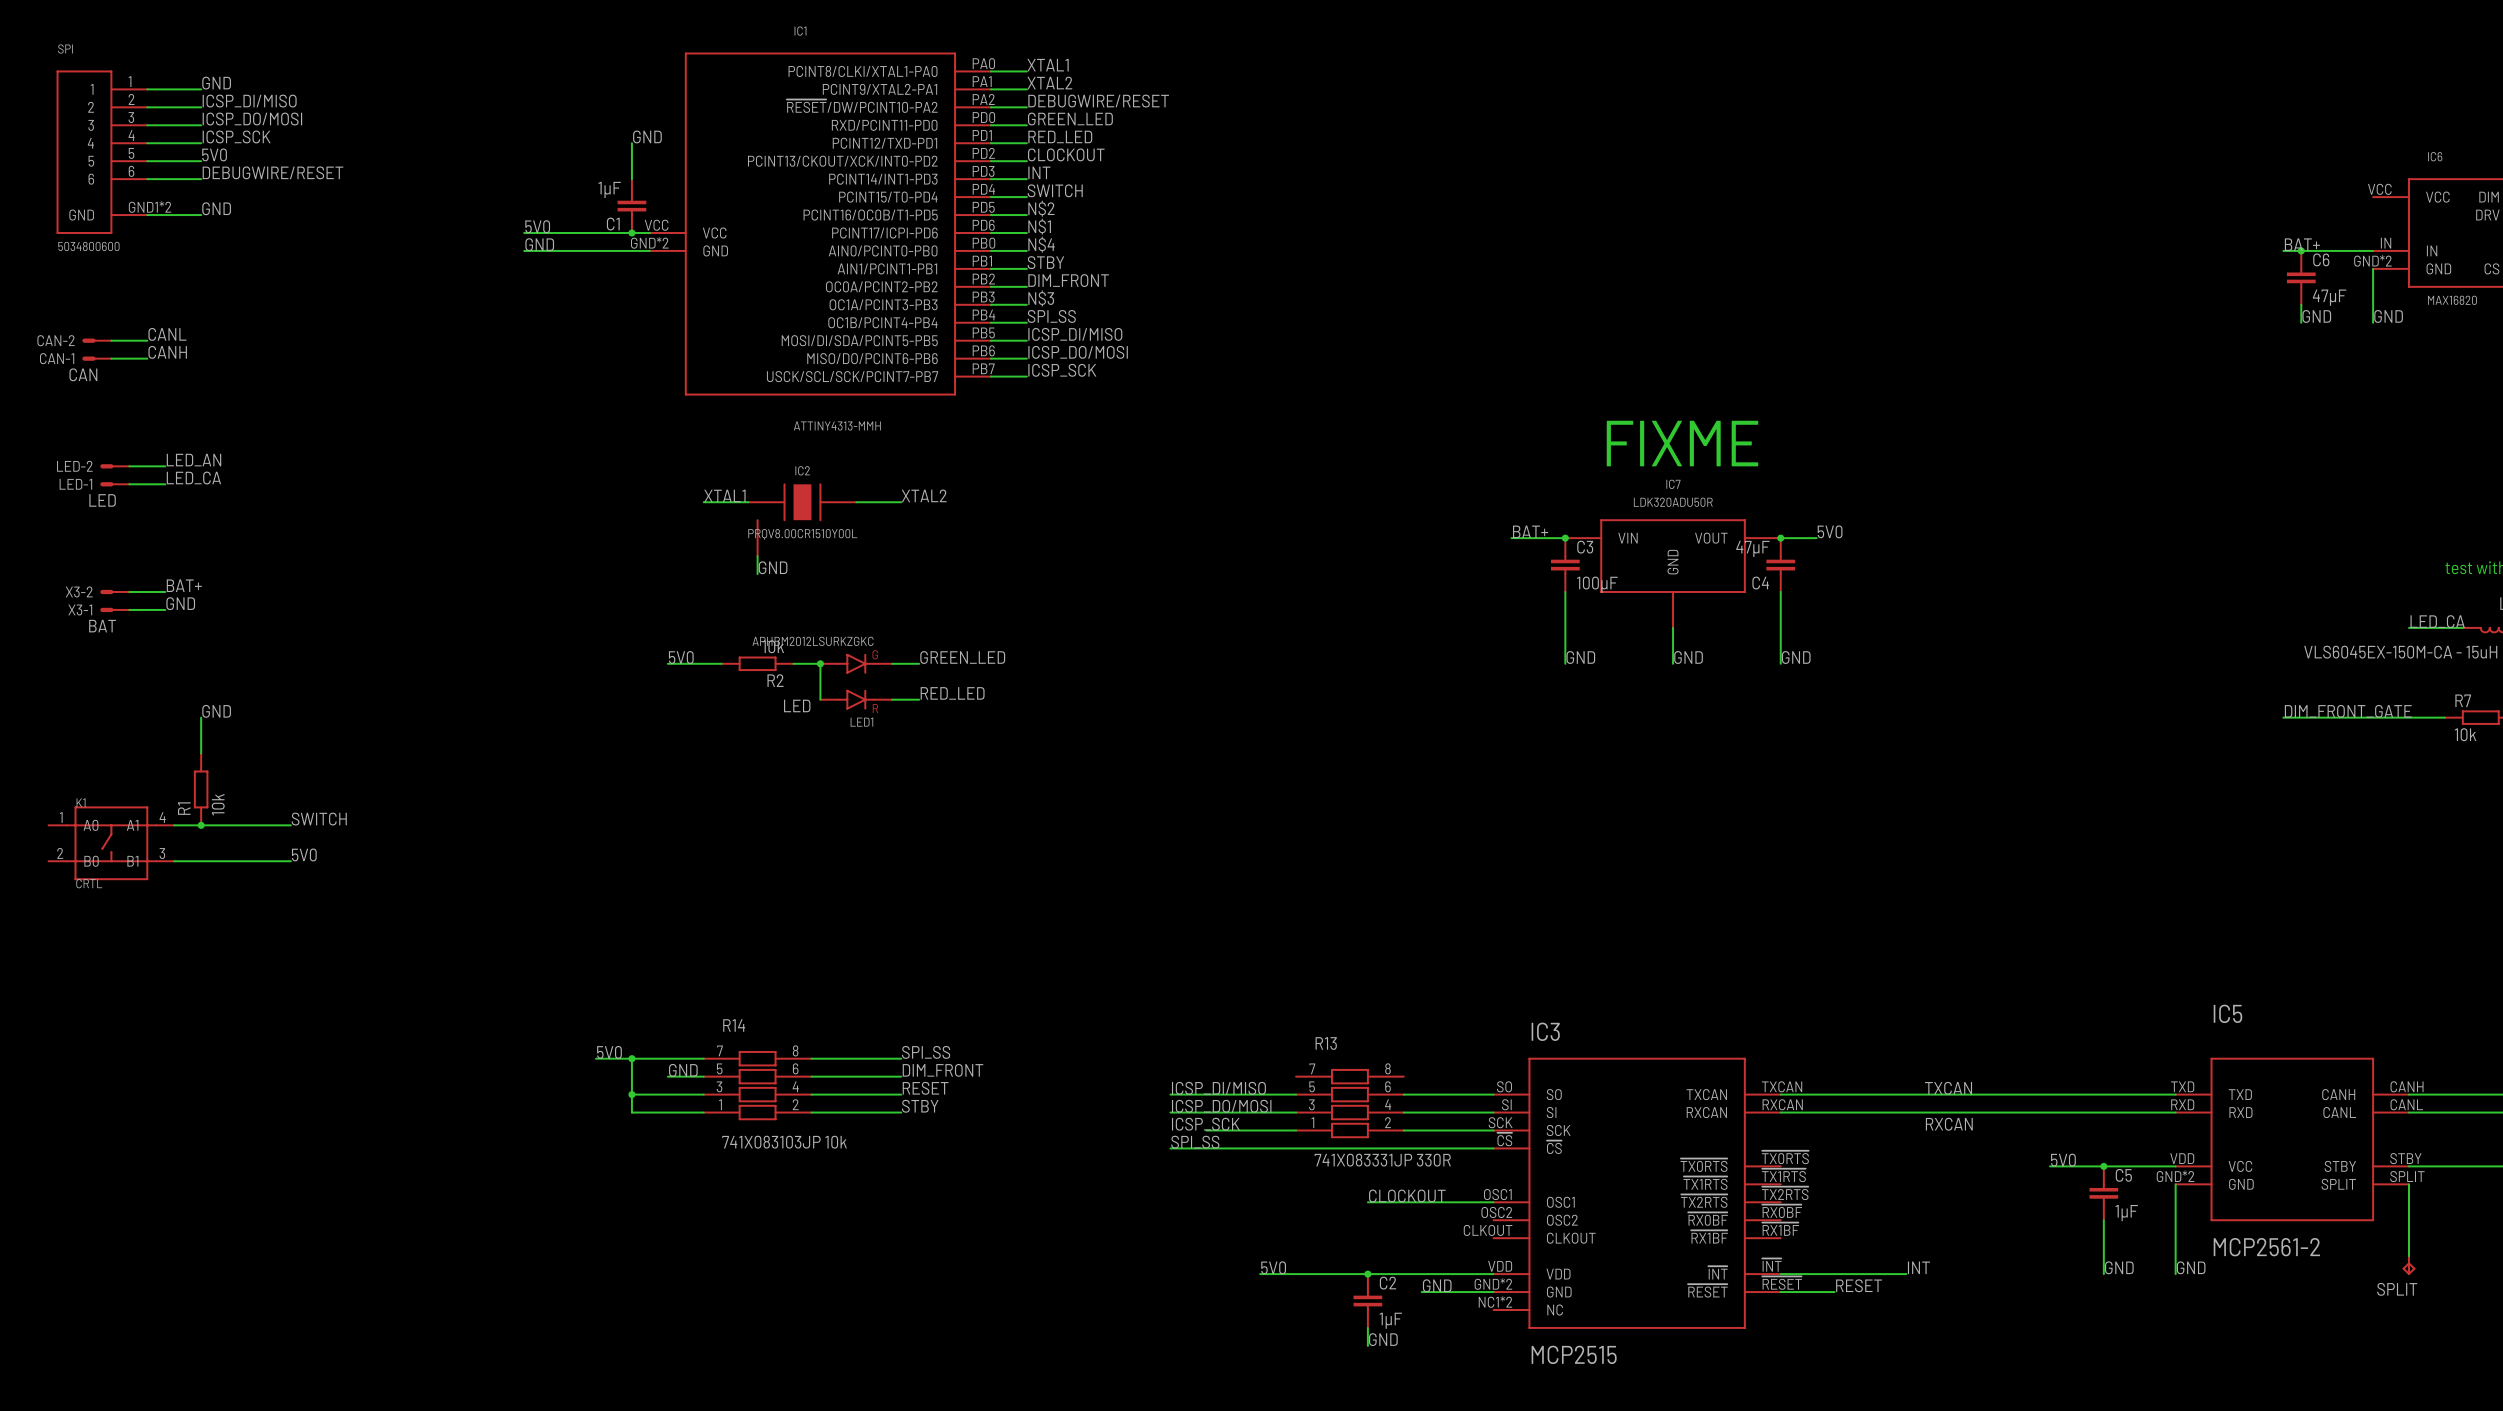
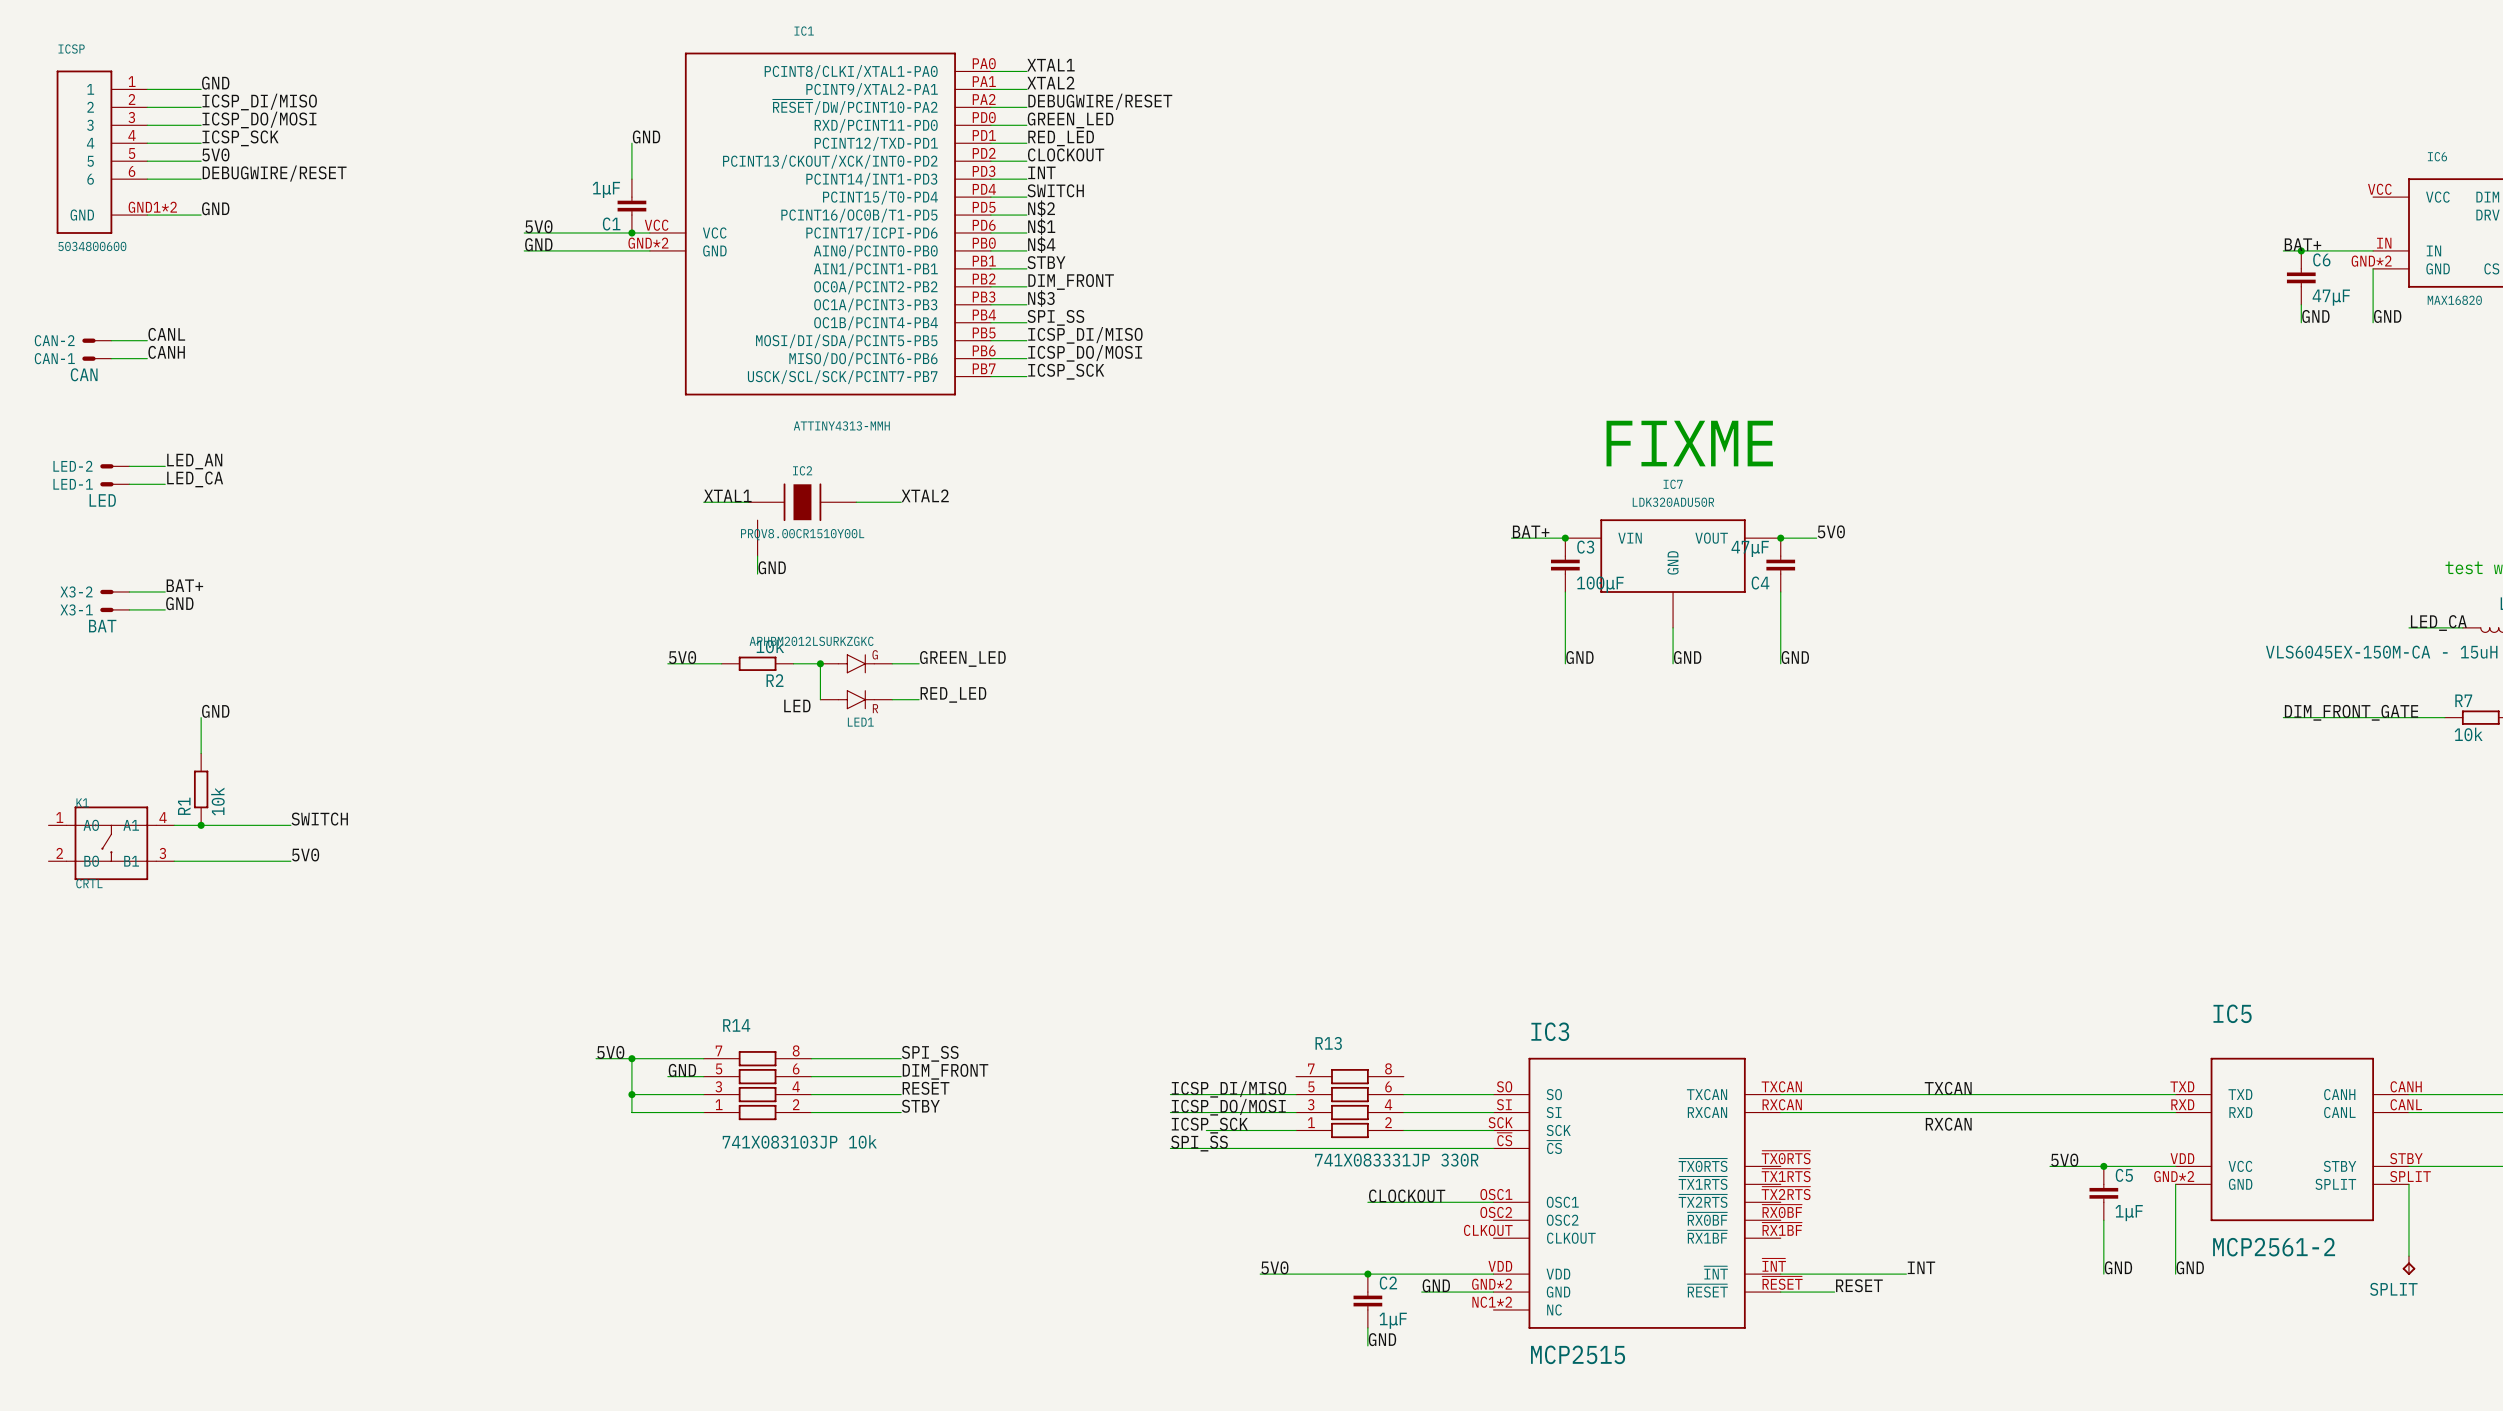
SPI name: SPI (65, 49) -> ICSP (71, 49)

